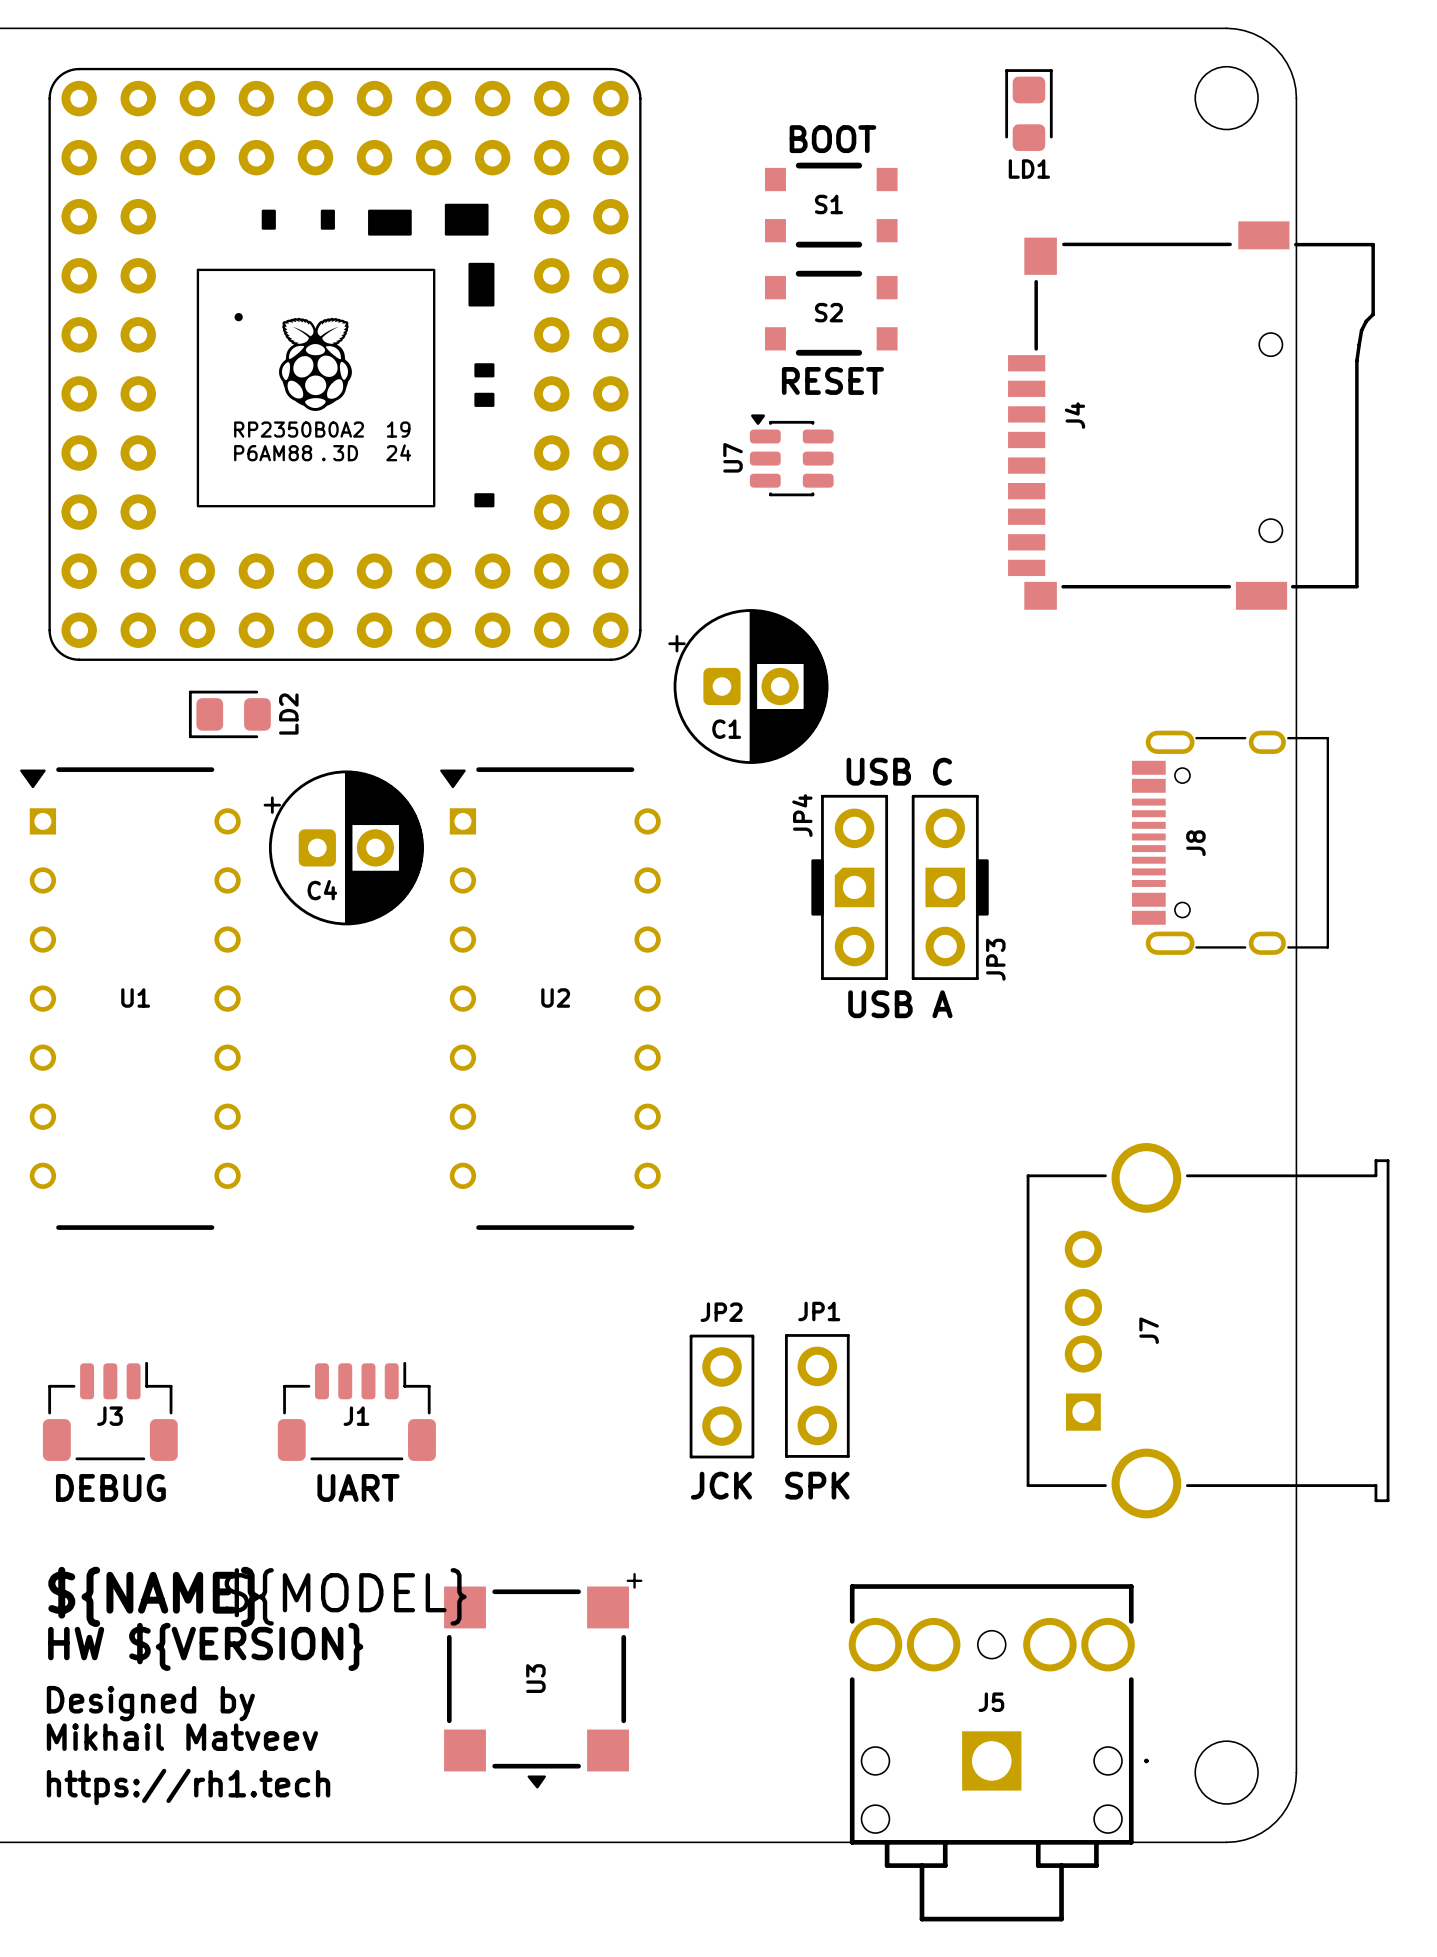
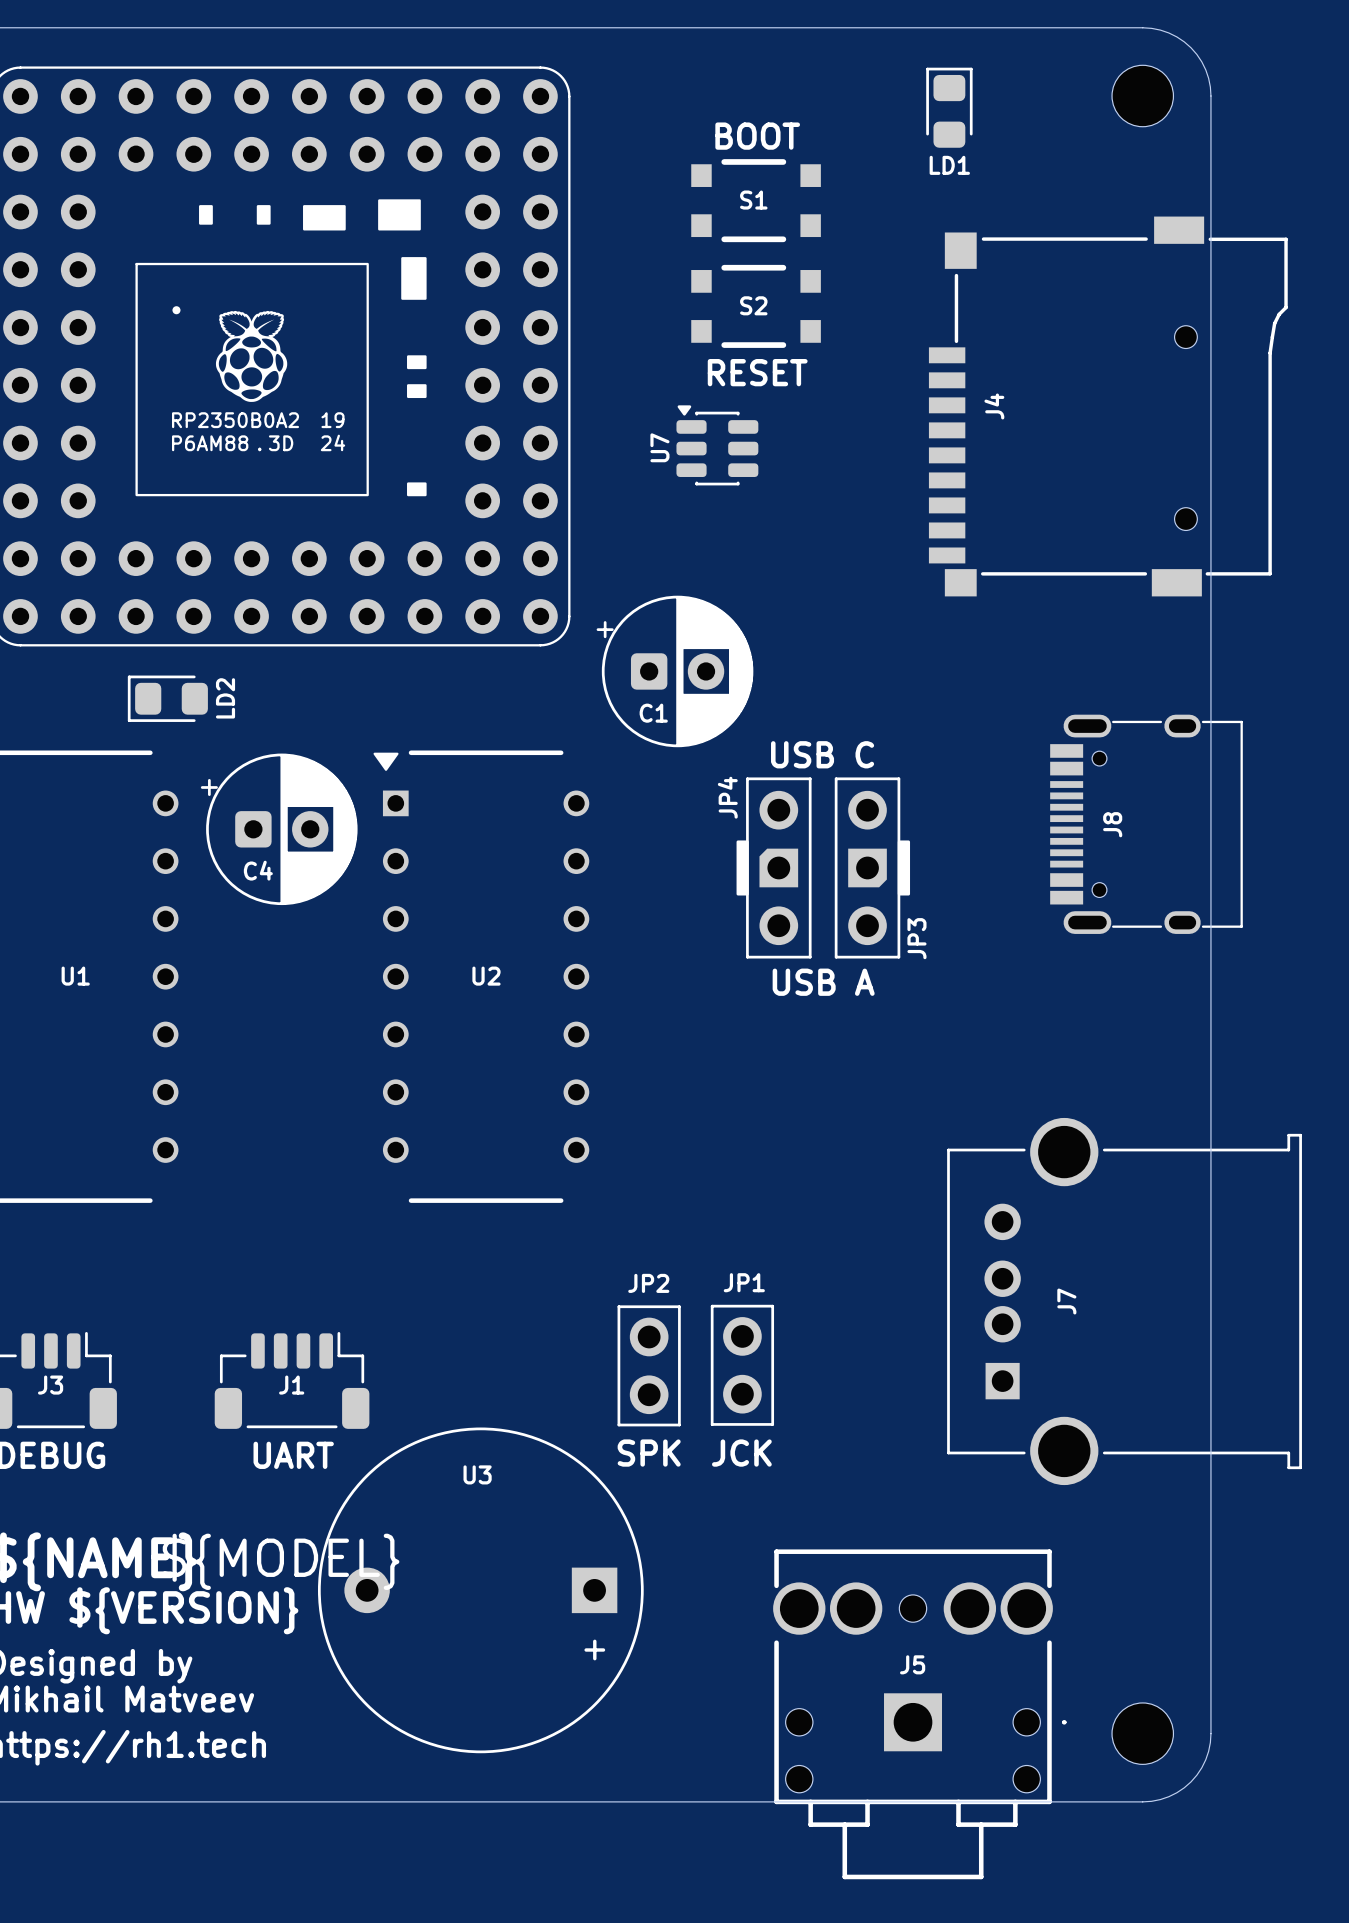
text: JCK (721, 1485) -> SPK (649, 1453)
text: SPK (817, 1485) -> JCK (741, 1453)
U3 footprint: [444, 1572, 643, 1789] -> [317, 1427, 644, 1754]
U3 name position: U3 (535, 1678) -> U3 (477, 1474)

